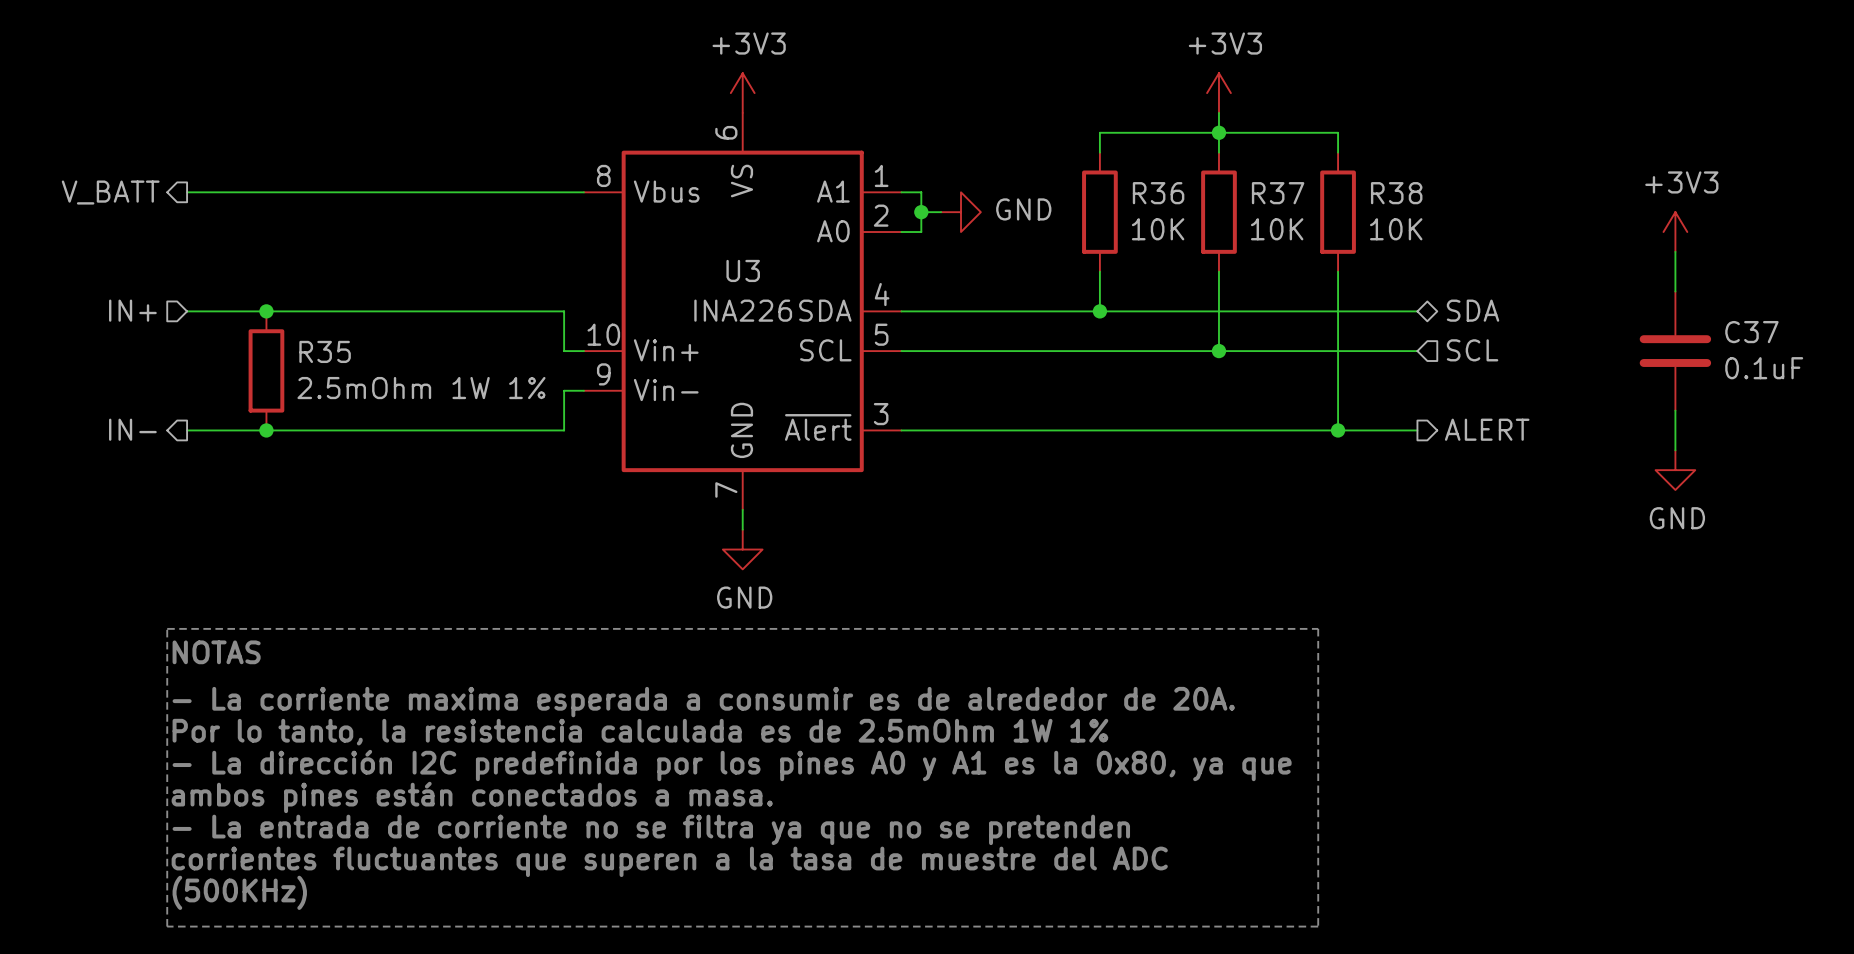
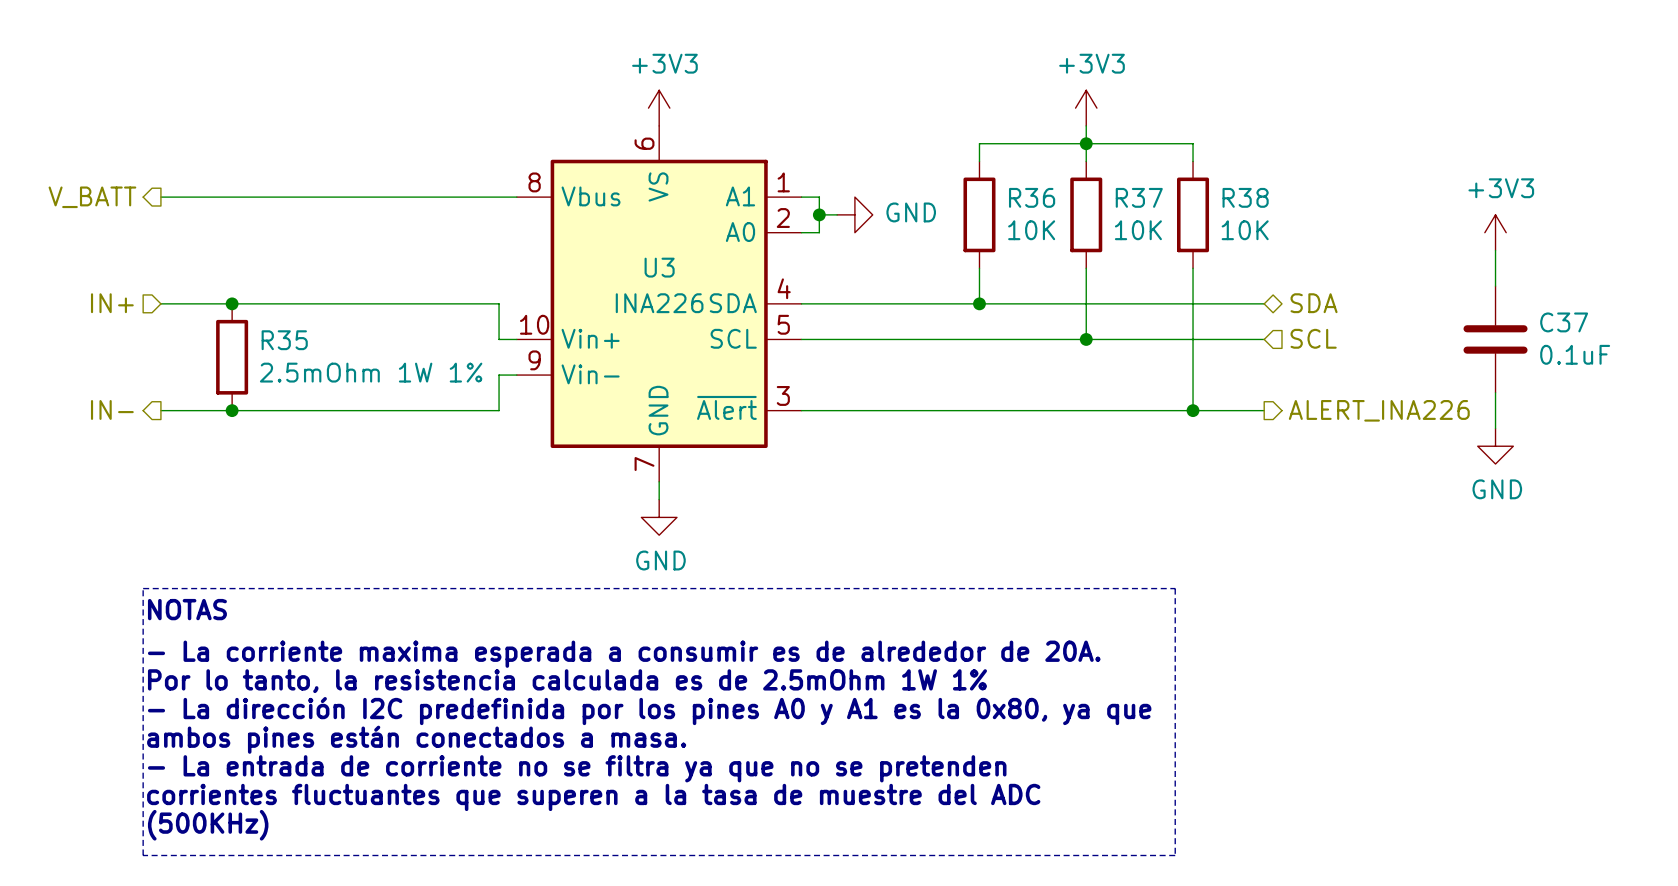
hierarchical label: ALERT (1487, 429) -> ALERT_INA226 (1379, 410)

